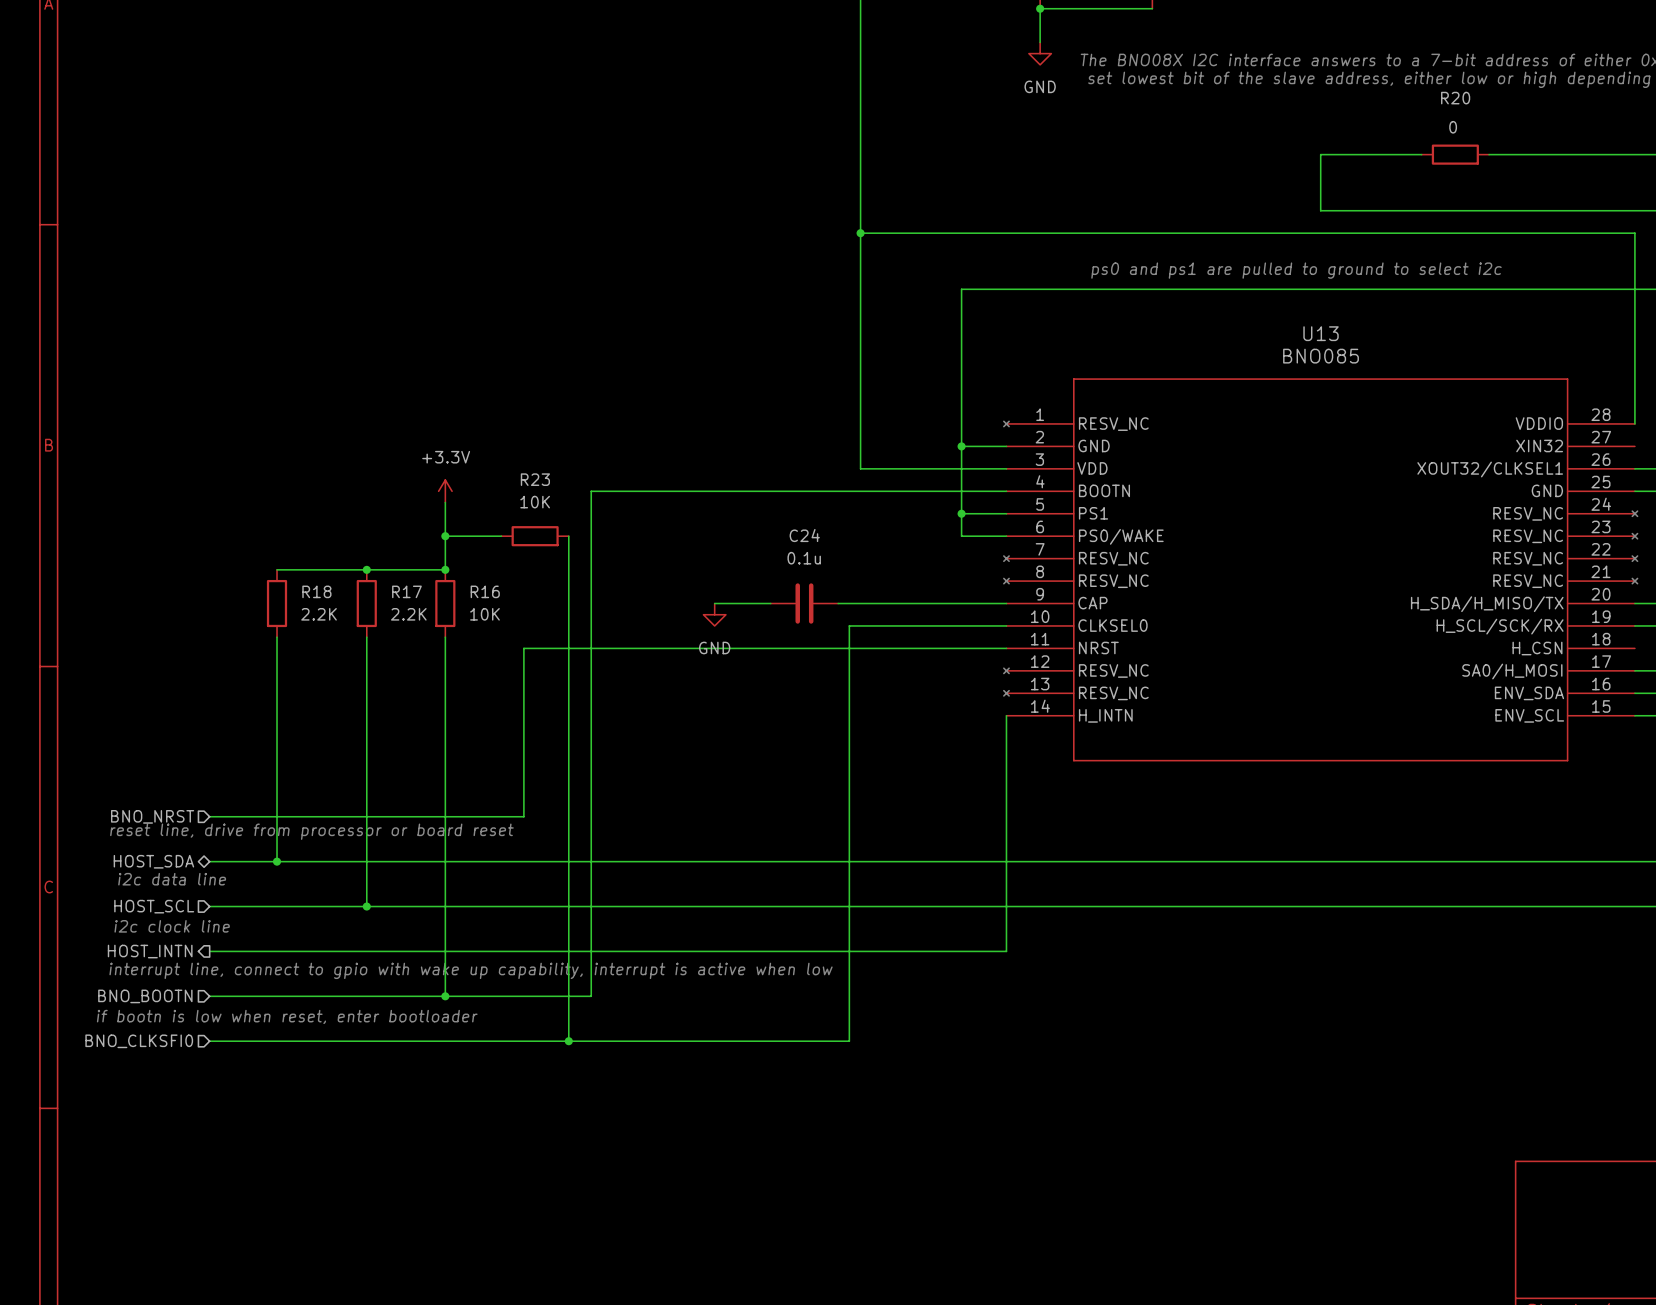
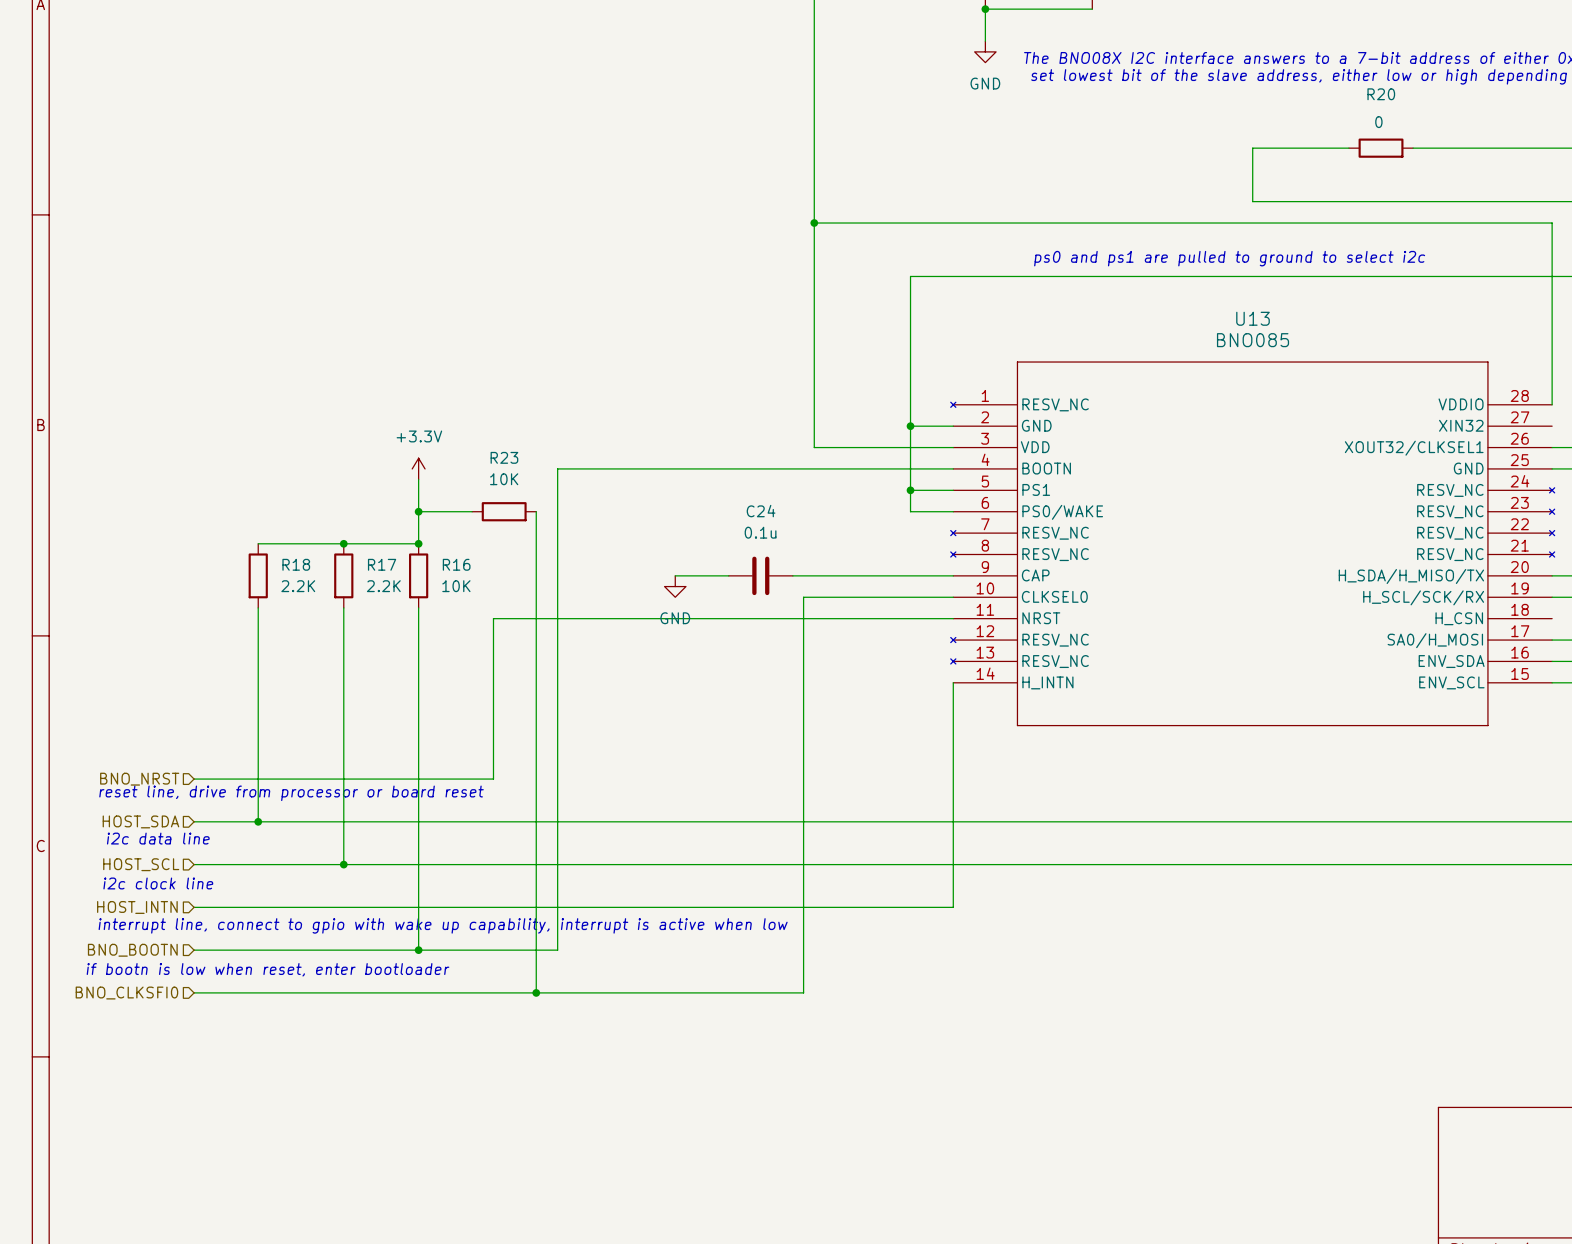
hierarchical label shape: bidirectional (153, 861) -> input (140, 821)
hierarchical label shape: output (150, 951) -> input (137, 907)

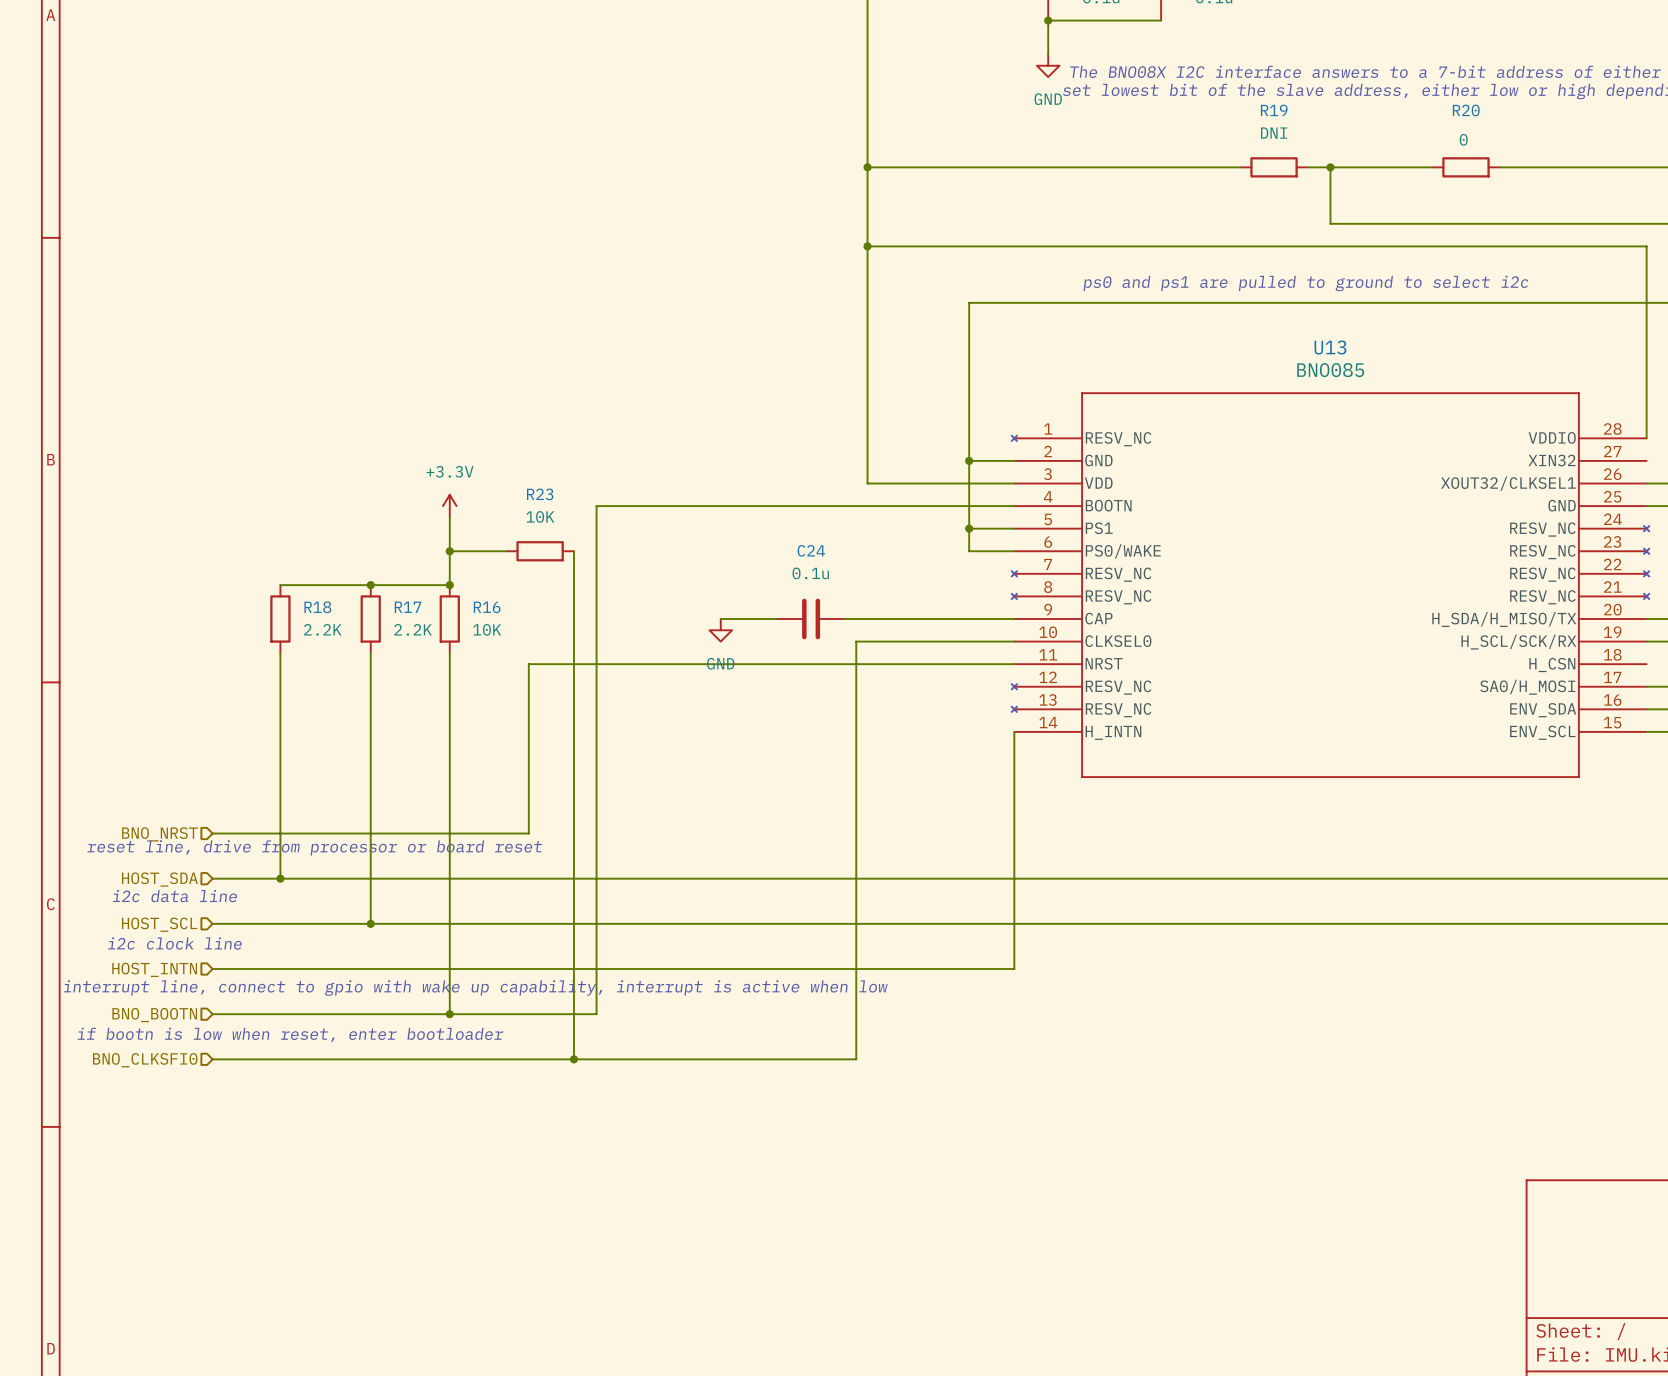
wire: none -> (867, 167) (1240, 167)
junction: none -> (867, 167)
R19: none -> DNI (1274, 167)
wire: none -> (1307, 167) (1330, 167)
junction: none -> (1330, 167)

